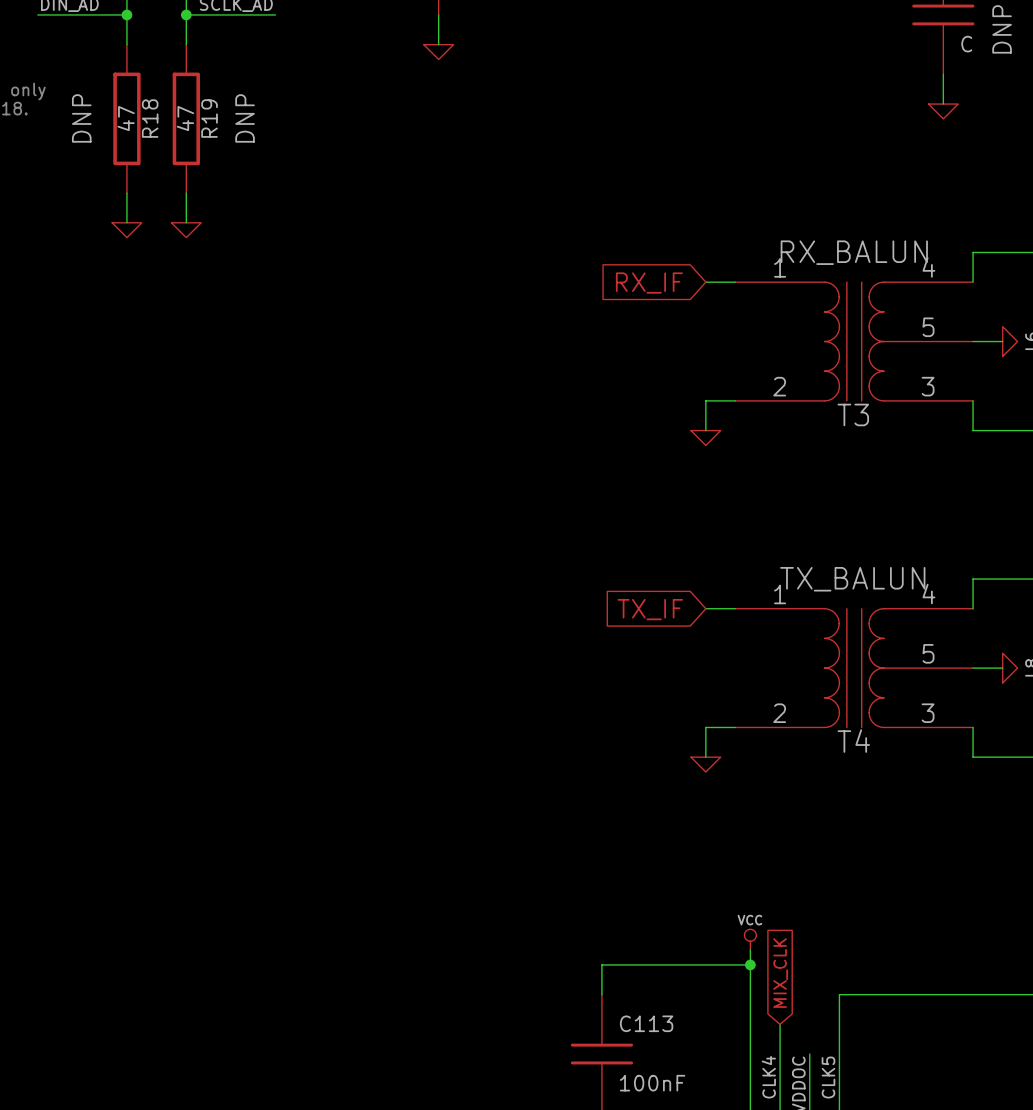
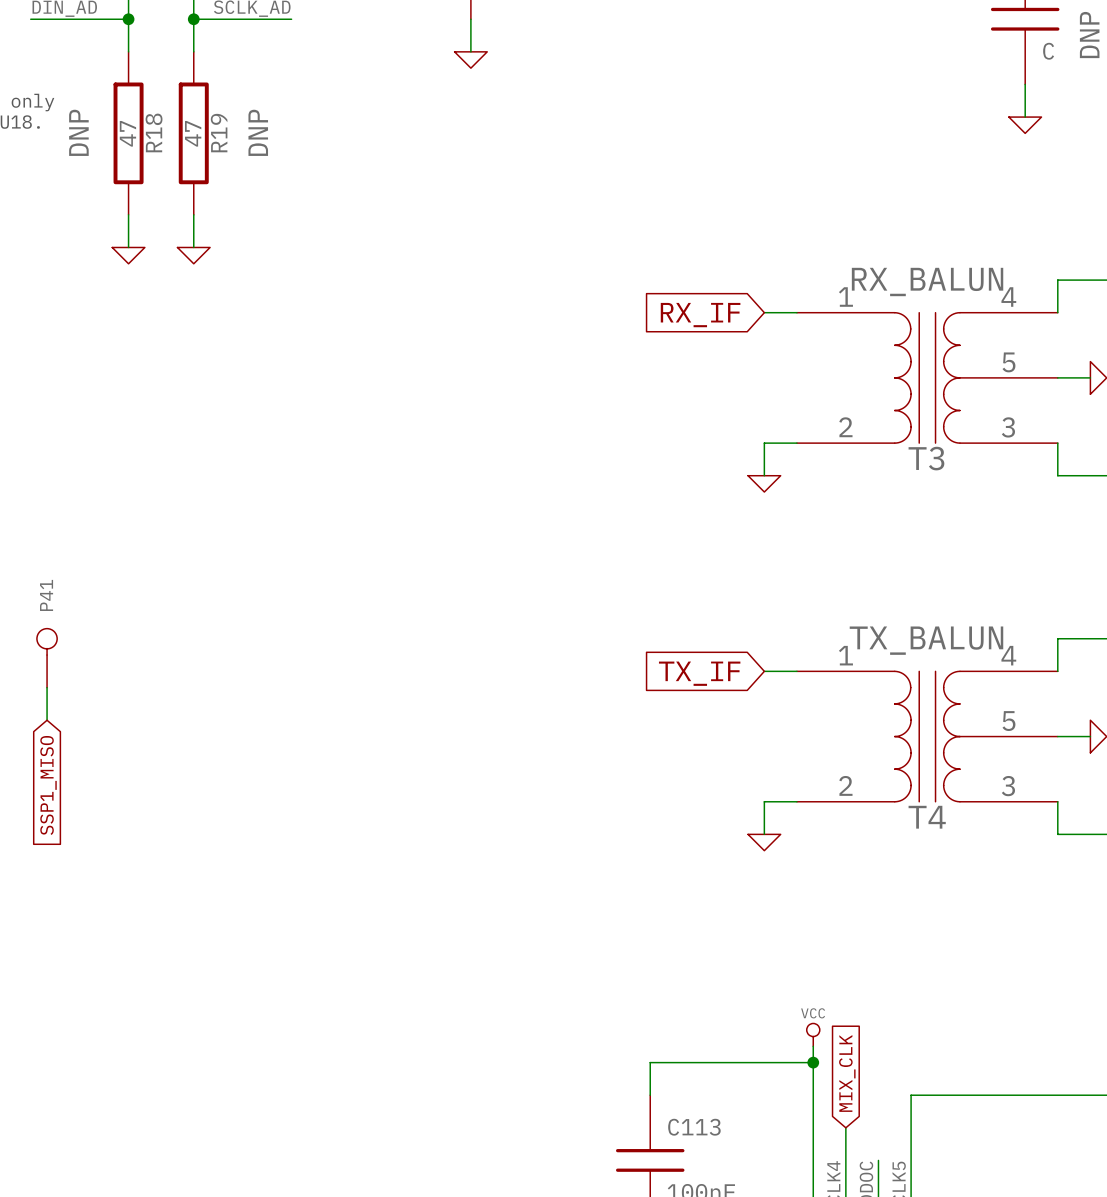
P41: none -> (47, 658)
wire: none -> (47, 687) (47, 720)
global label: none -> SSP1_MISO (48, 785)

